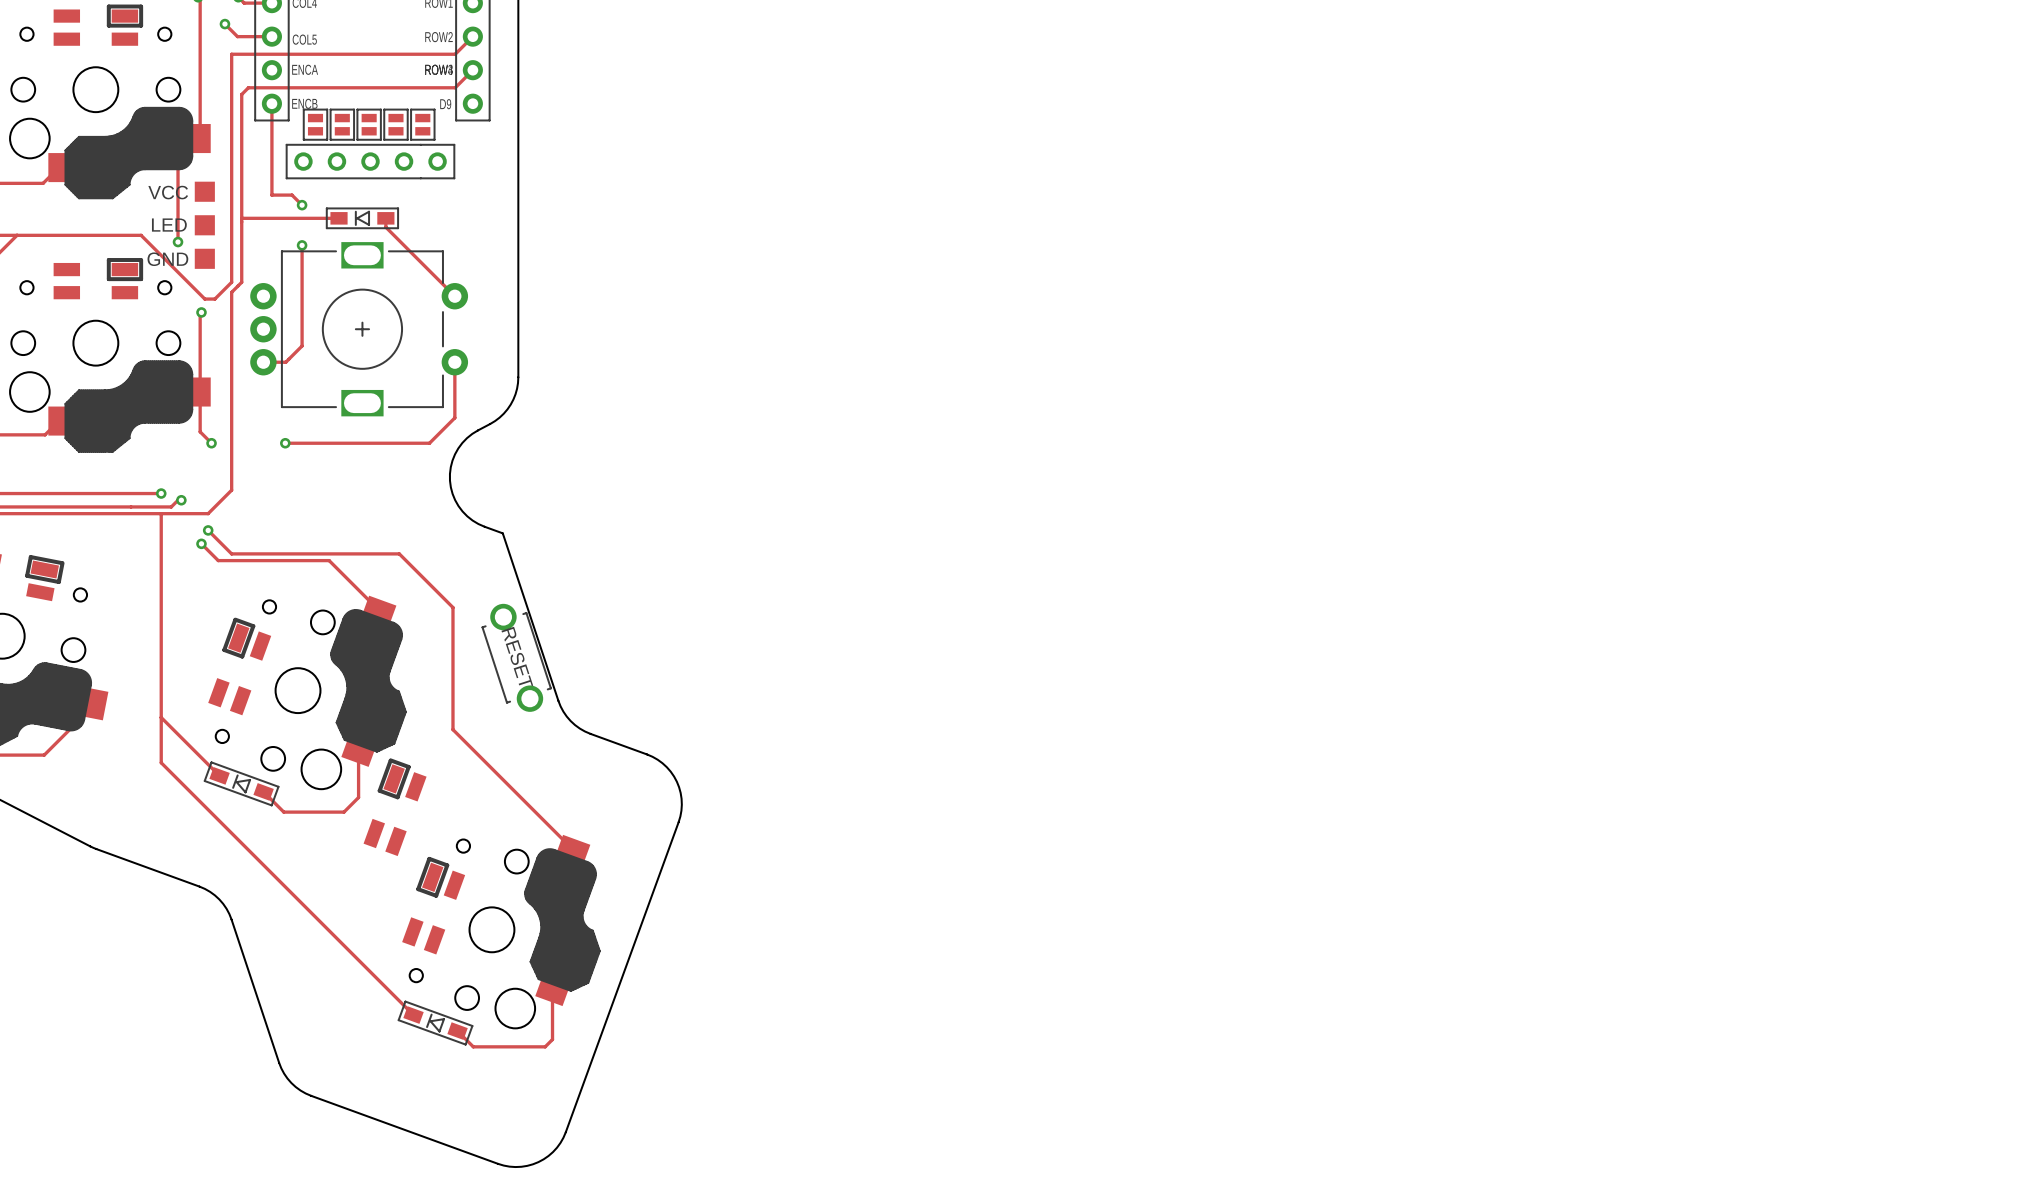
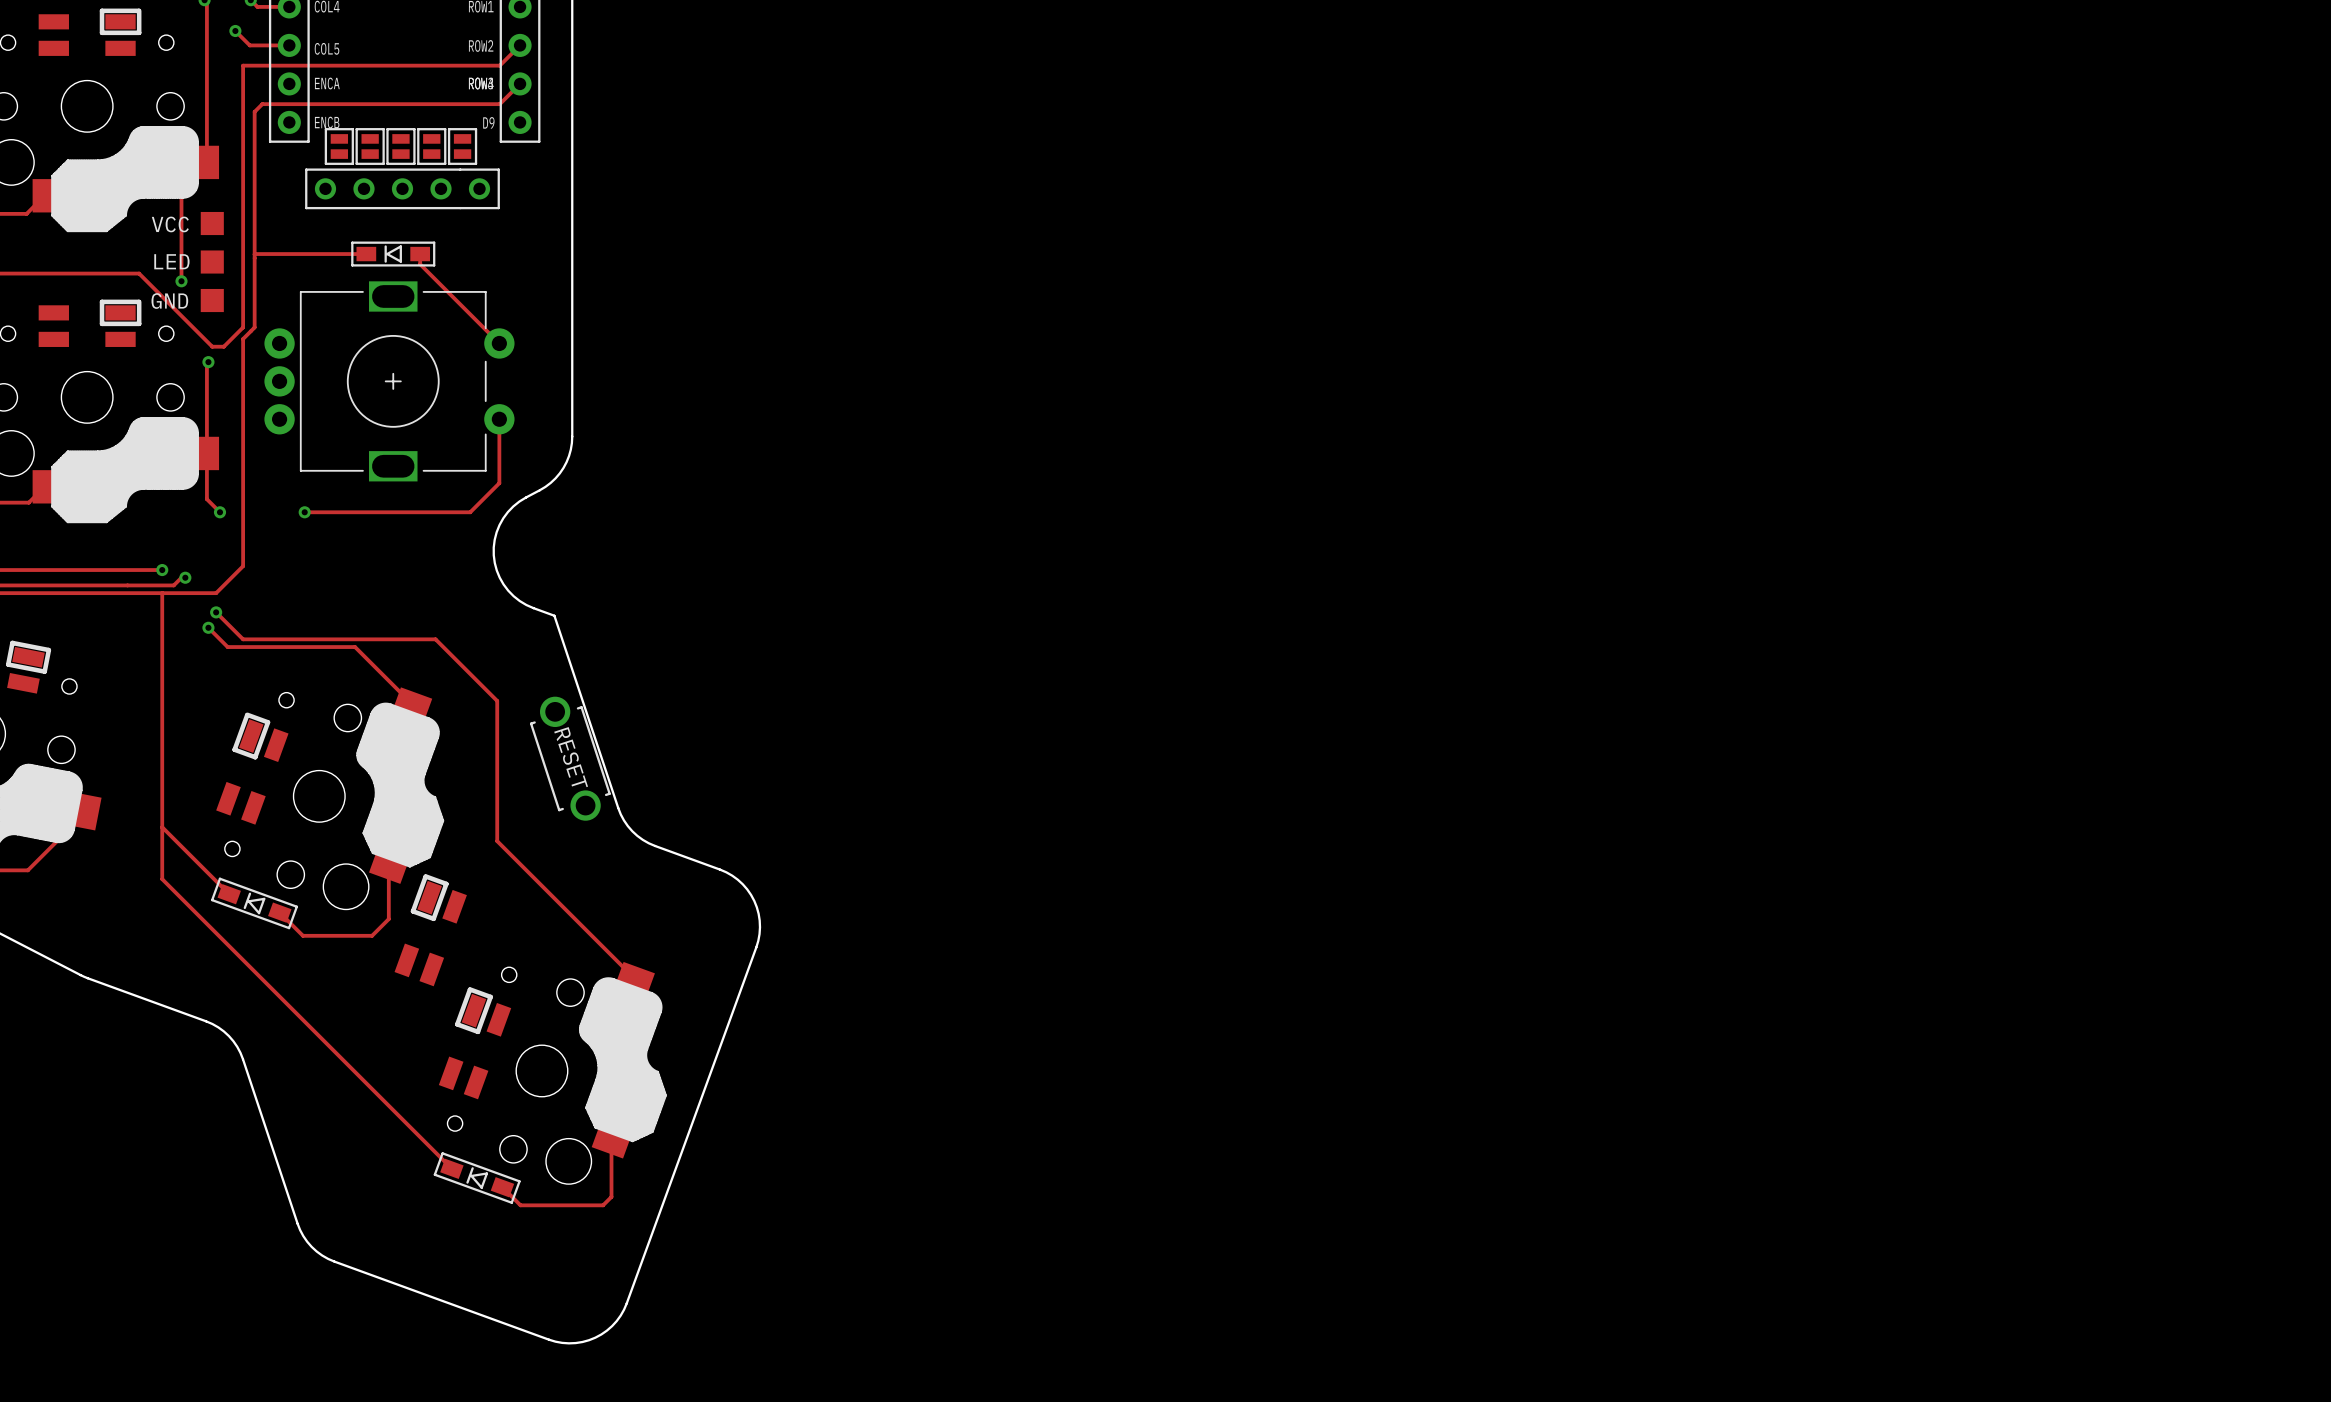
track: (271, 103) (271, 195) -> none
track: (271, 195) (292, 195) (302, 205) -> none
via: (302, 205) -> none
track: (302, 245) (302, 345) (285, 362) (263, 362) -> none
via: (302, 245) -> none

